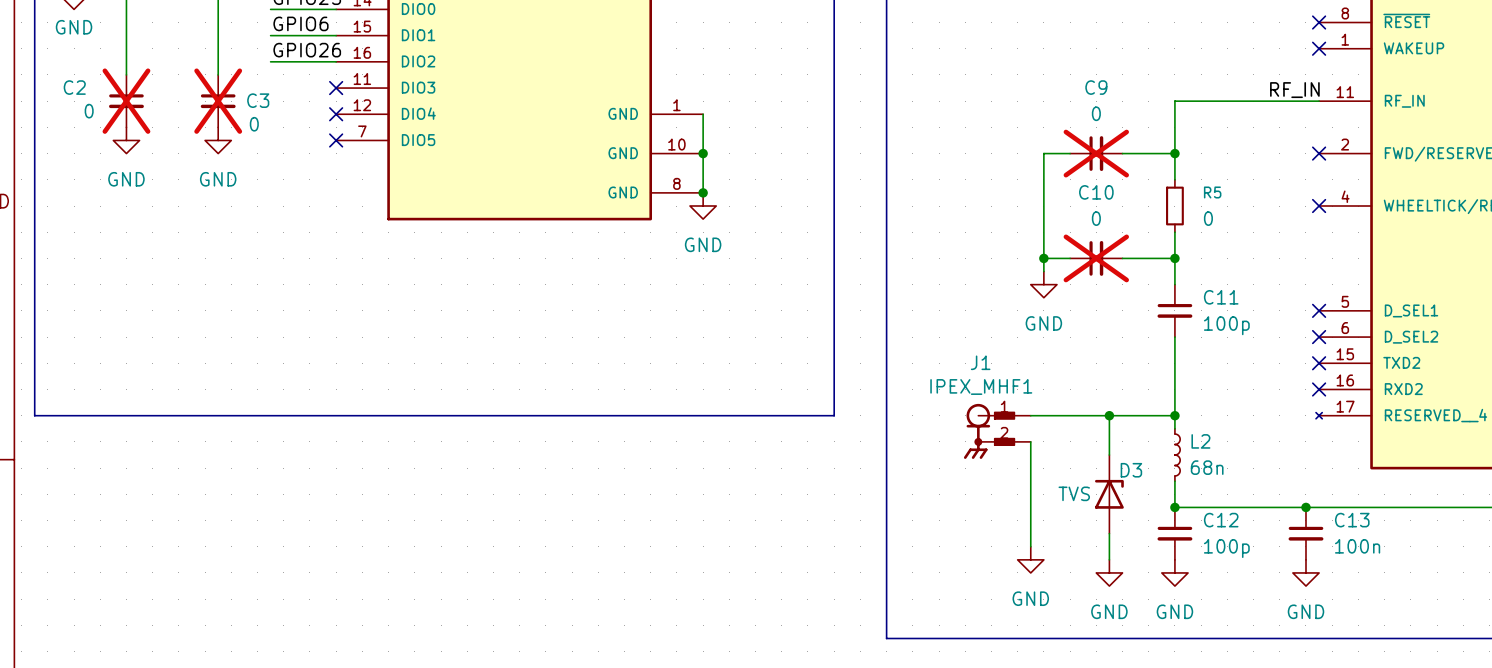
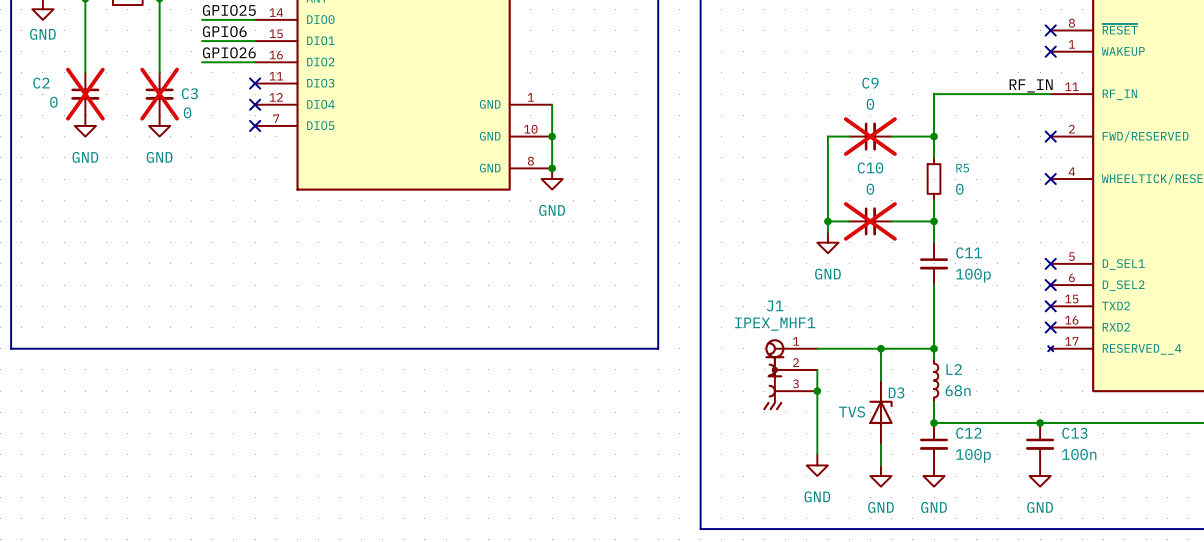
J1 symbol: [963, 403, 1031, 459] -> [763, 339, 818, 411]
junction: none -> (817, 391)

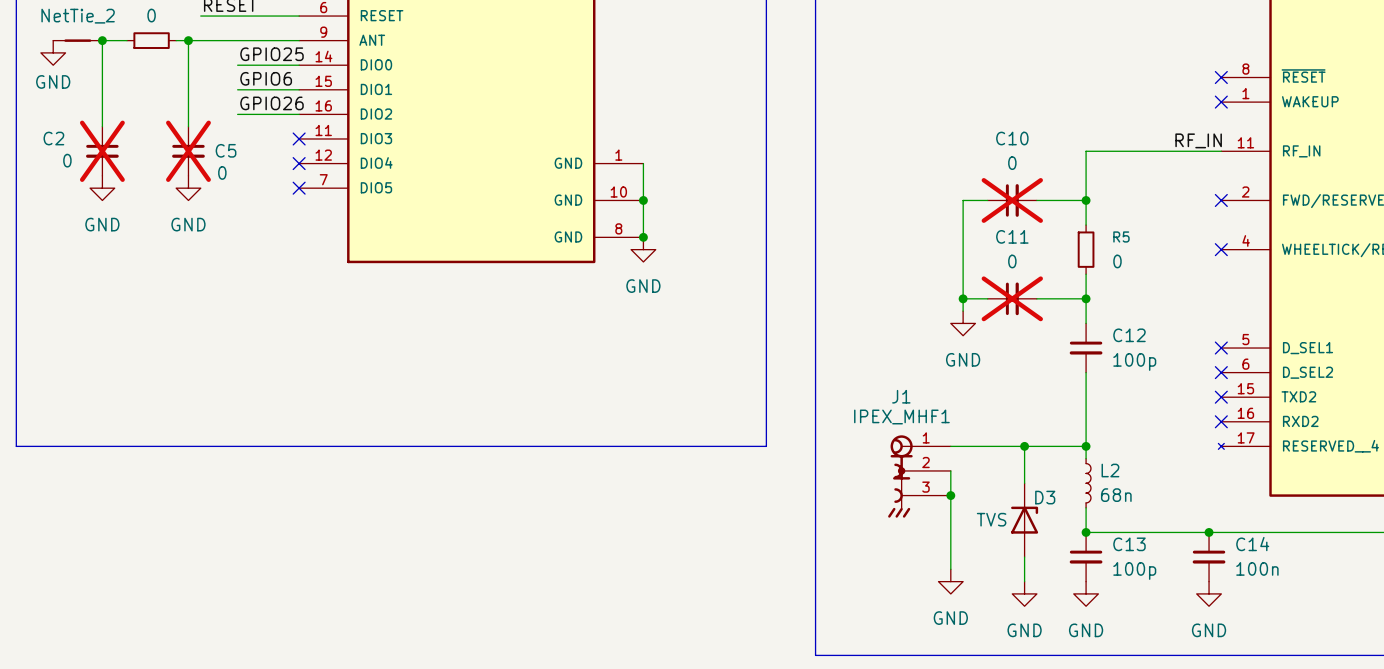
C9 name: C9 (870, 83) -> C10 (1012, 138)
C3 name: C3 (189, 93) -> C5 (226, 150)
C10 name: C10 (870, 167) -> C11 (1012, 236)
C11 name: C11 (969, 252) -> C12 (1129, 335)
C12 name: C12 (968, 433) -> C13 (1129, 544)
C13 name: C13 (1074, 433) -> C14 (1252, 544)

